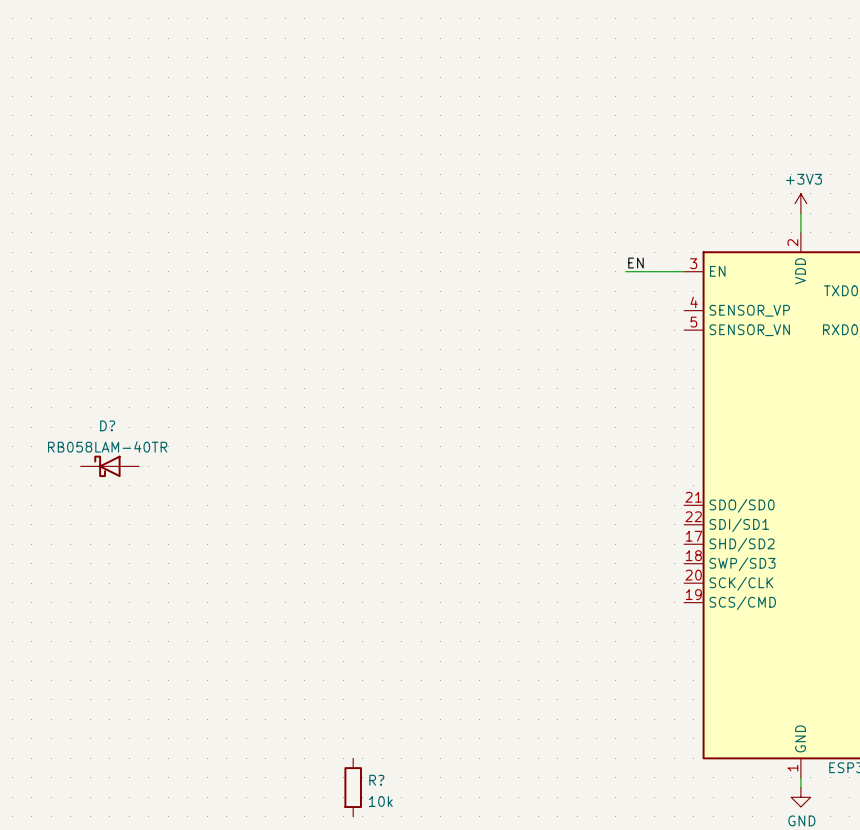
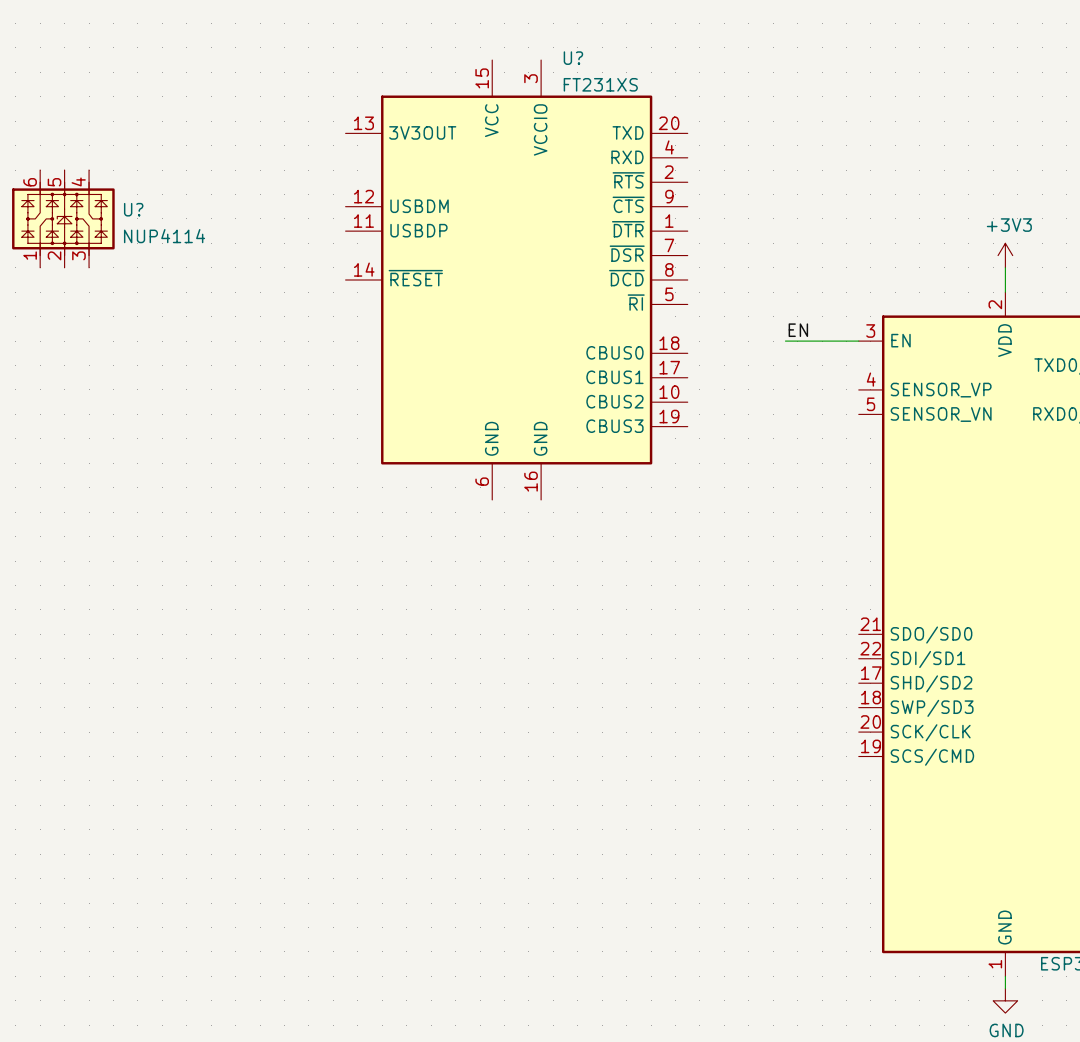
U?: none -> NUP4114 (63, 218)
U?: none -> FT231XS (516, 280)
D?: RB058LAM-40TR (109, 466) -> none
R?: 10k (353, 787) -> none

